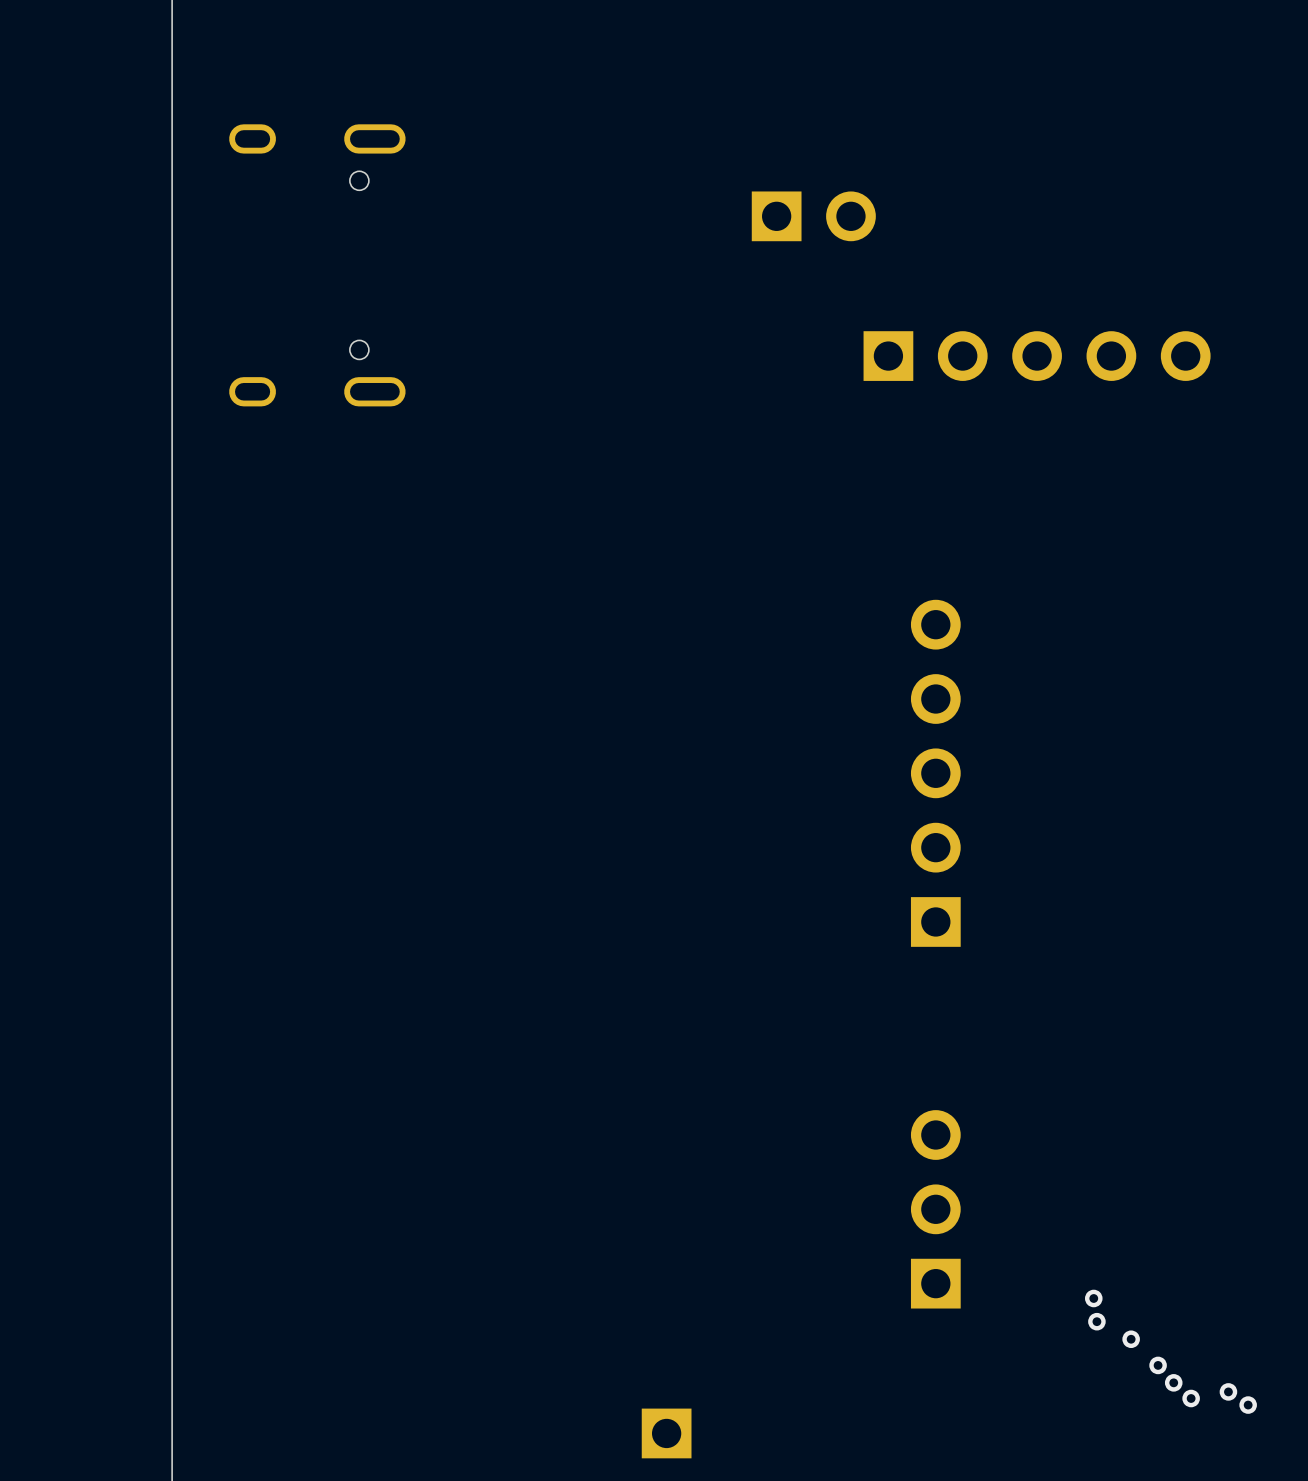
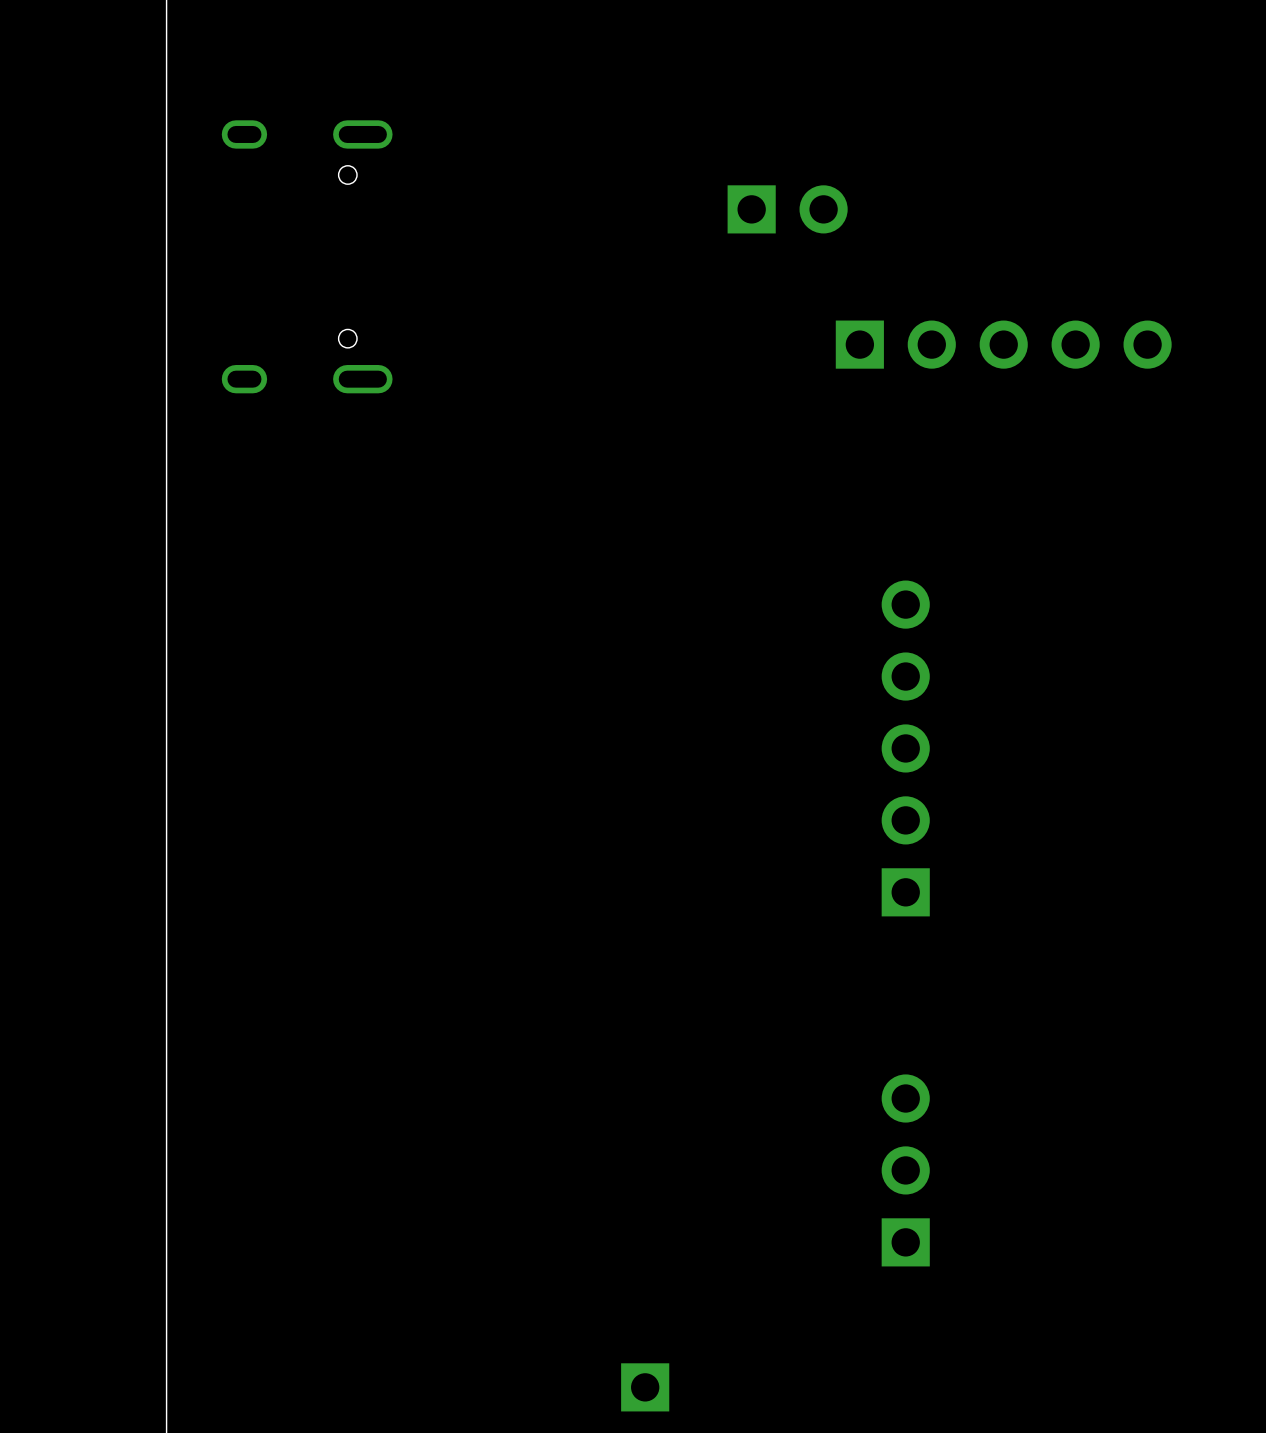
via: (1093, 1298) -> none
via: (1096, 1321) -> none
via: (1131, 1339) -> none
via: (1158, 1365) -> none
via: (1173, 1382) -> none
via: (1228, 1391) -> none
via: (1191, 1398) -> none
via: (1248, 1405) -> none

